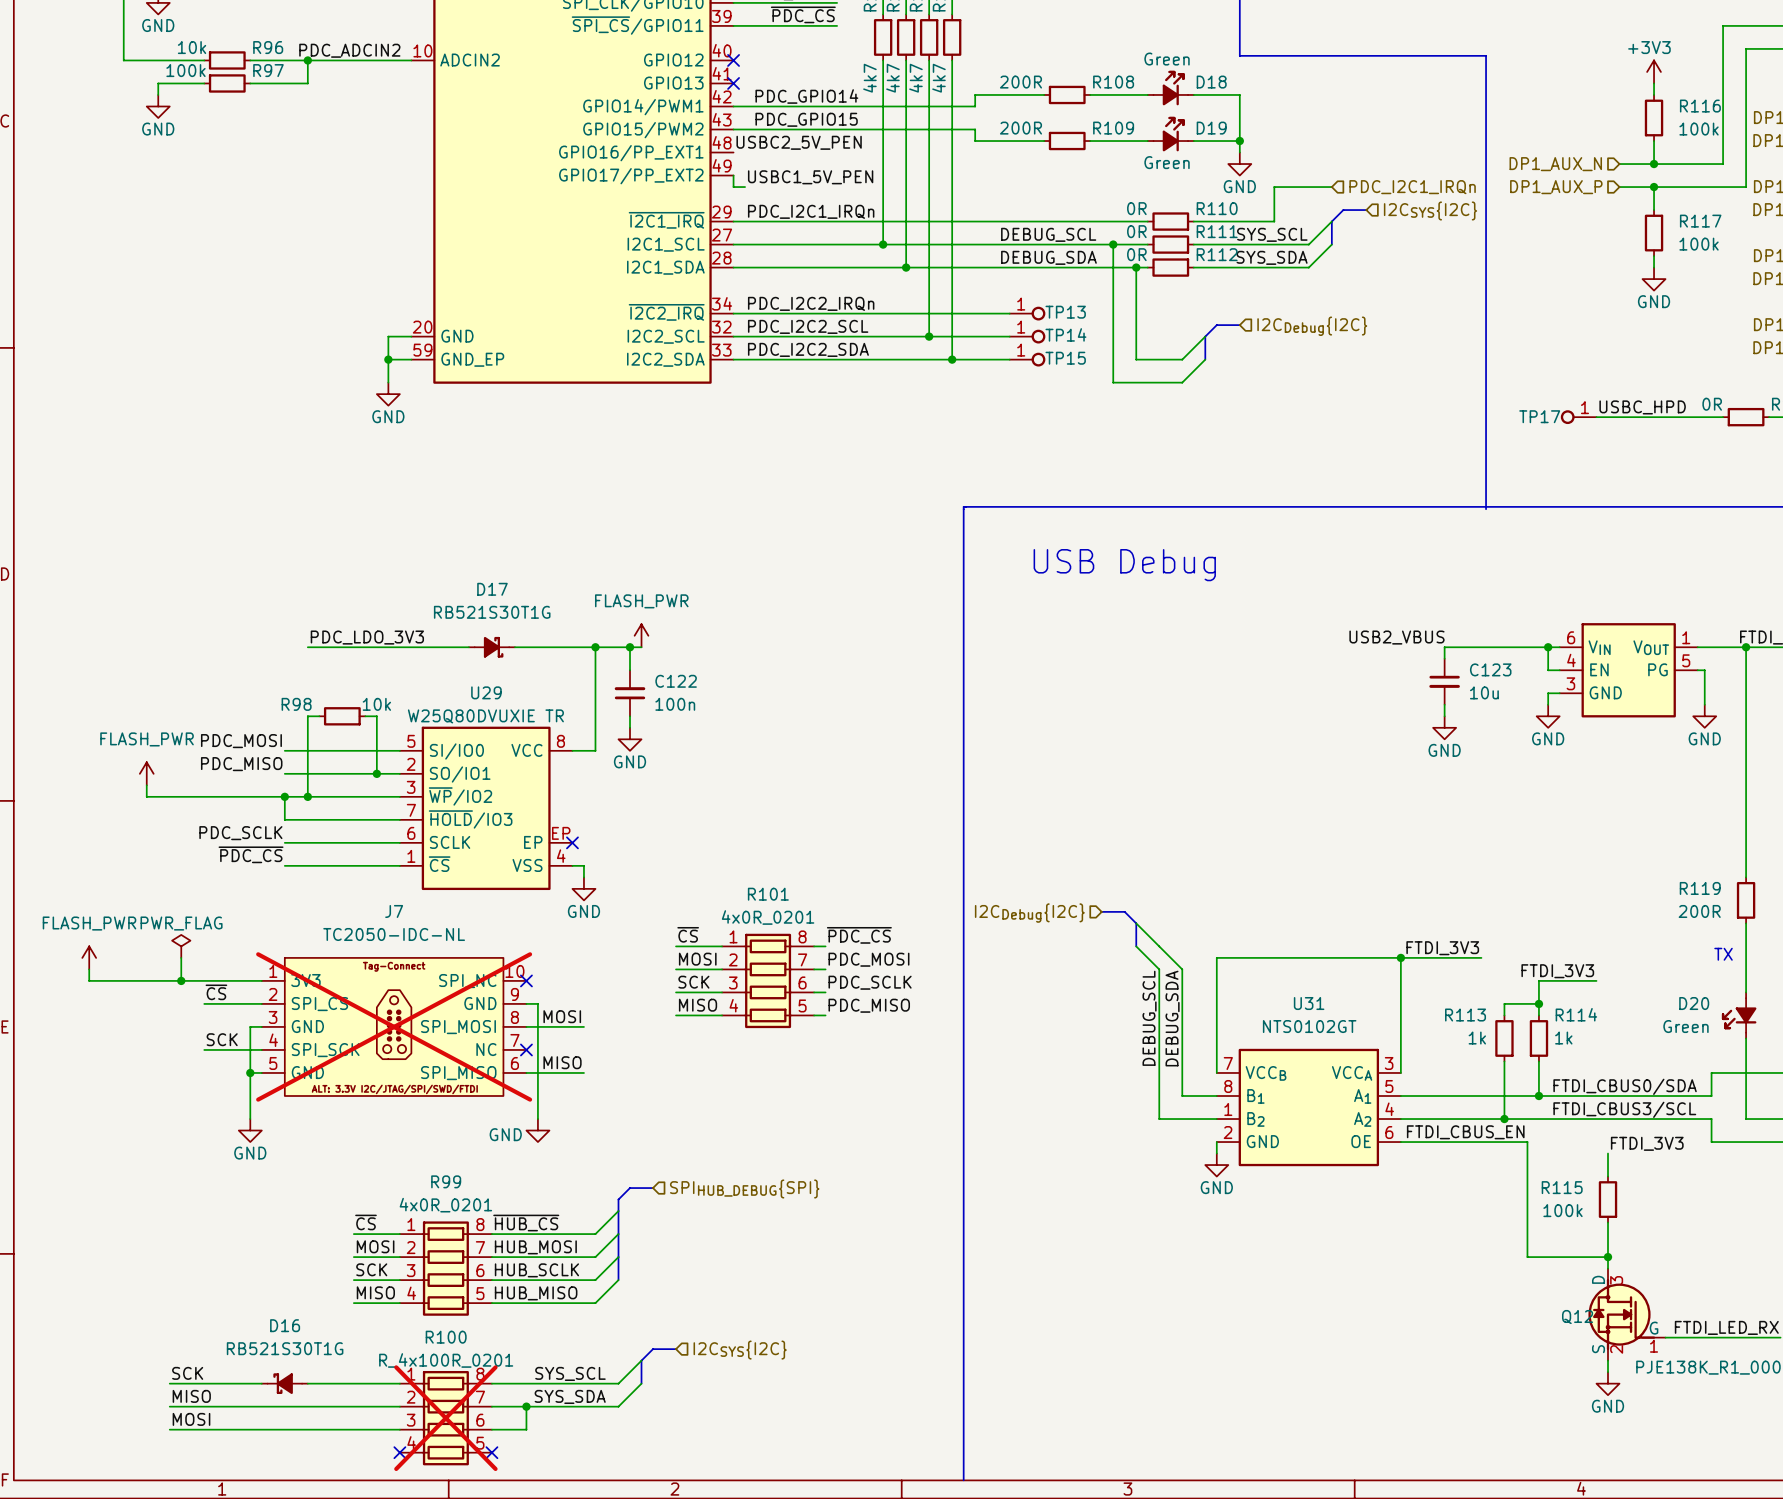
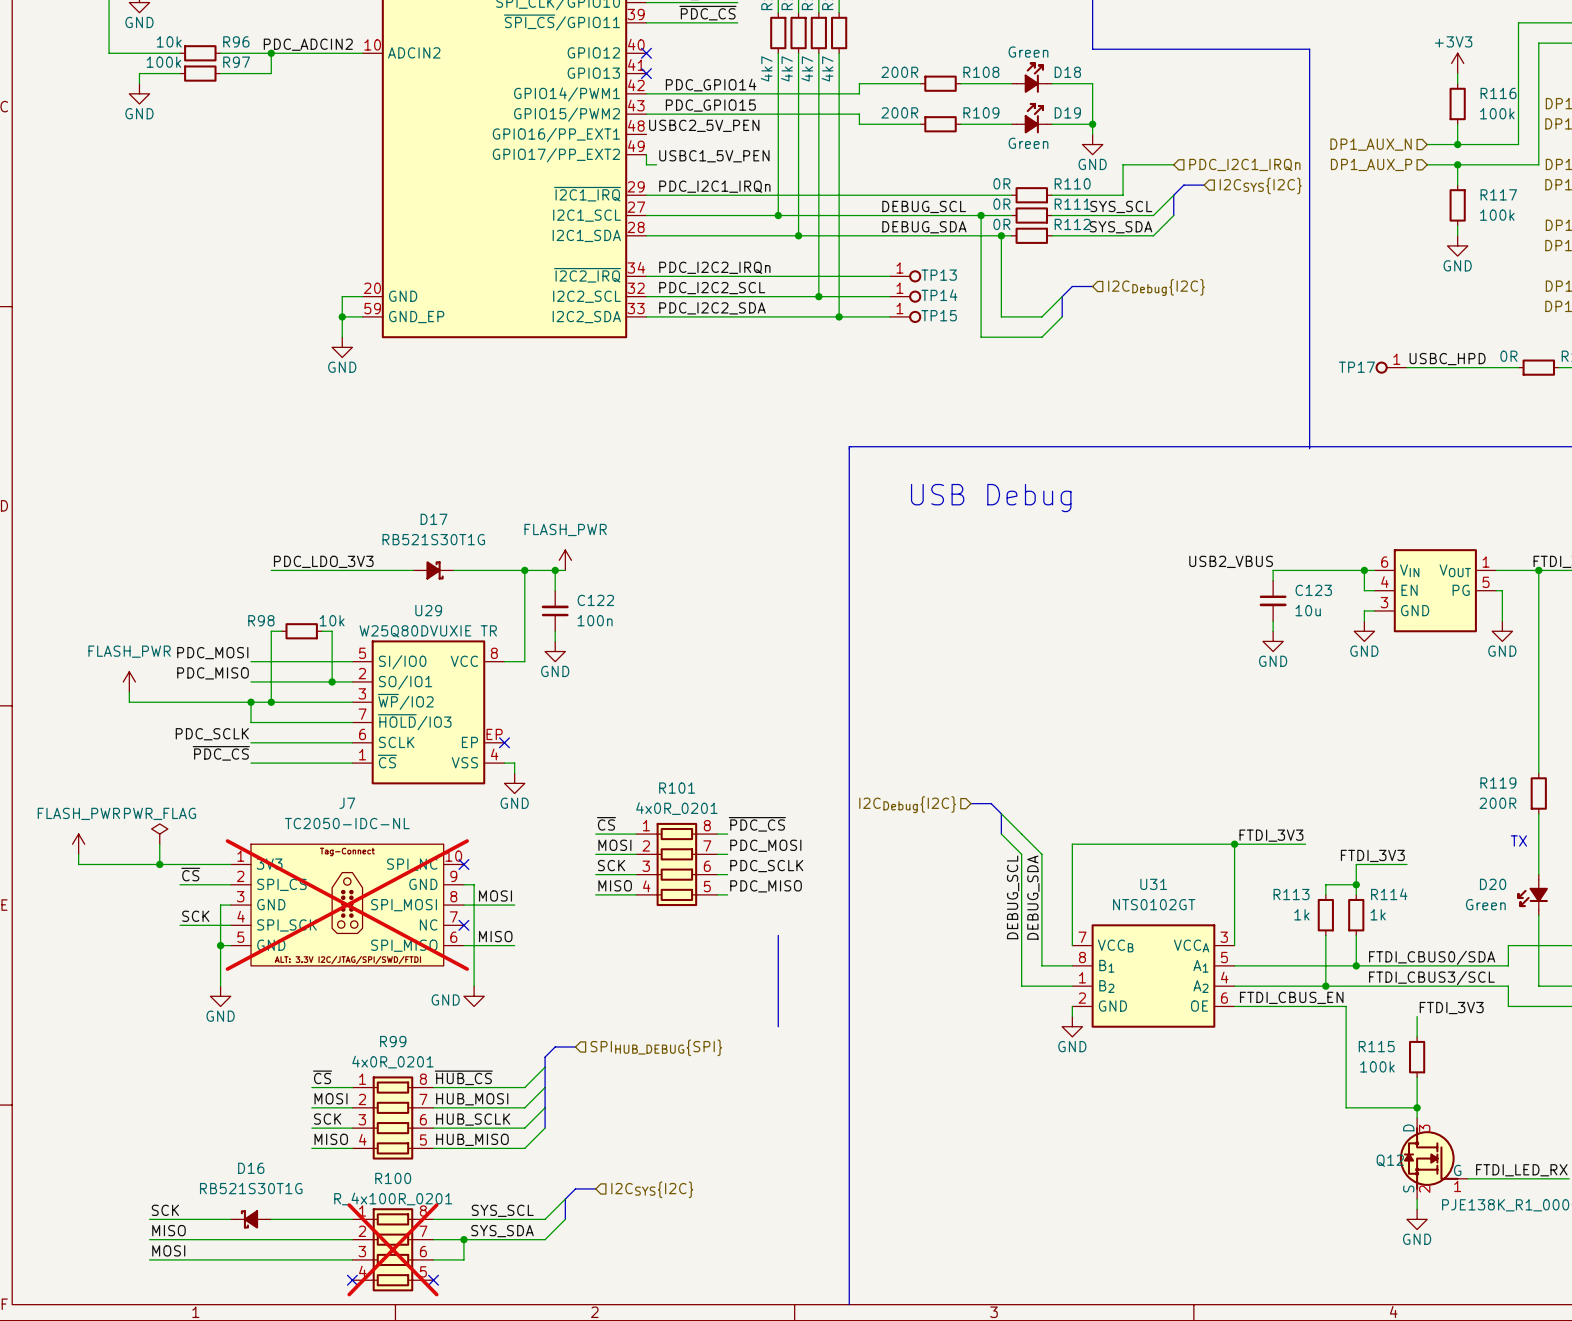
bus: none -> (778, 935) (778, 1026)

